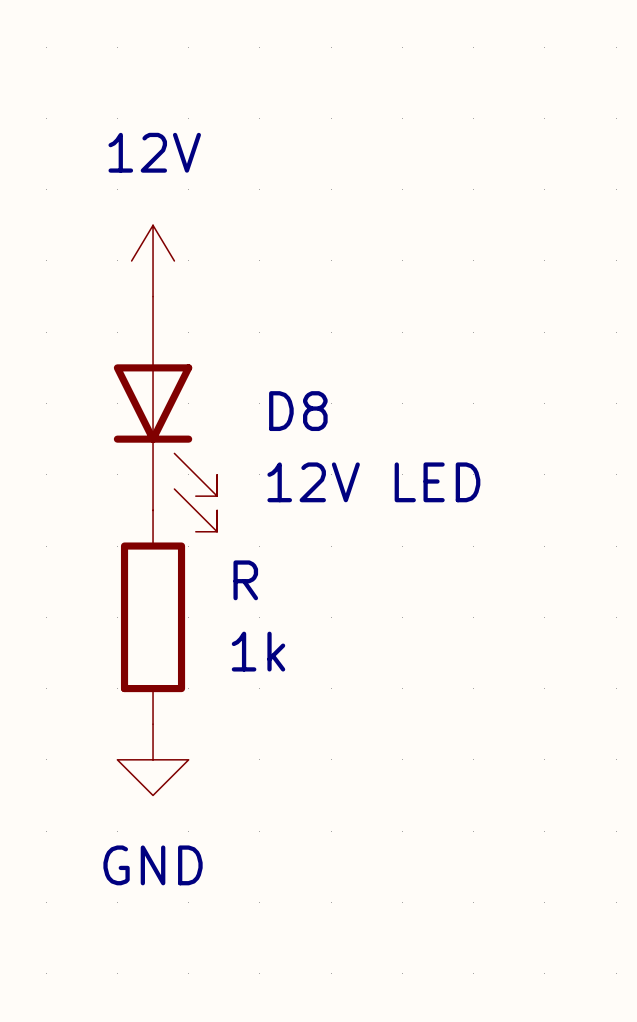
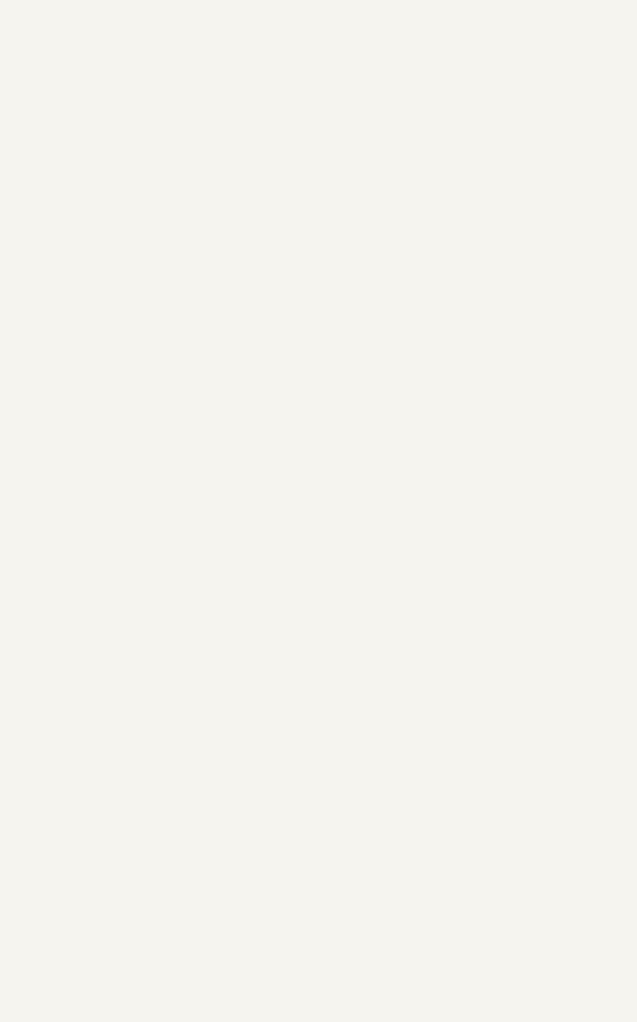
power symbol: 12V (153, 260) -> none
D8: 12V LED (165, 414) -> none
R: 1k (153, 617) -> none
power symbol: GND (153, 759) -> none

